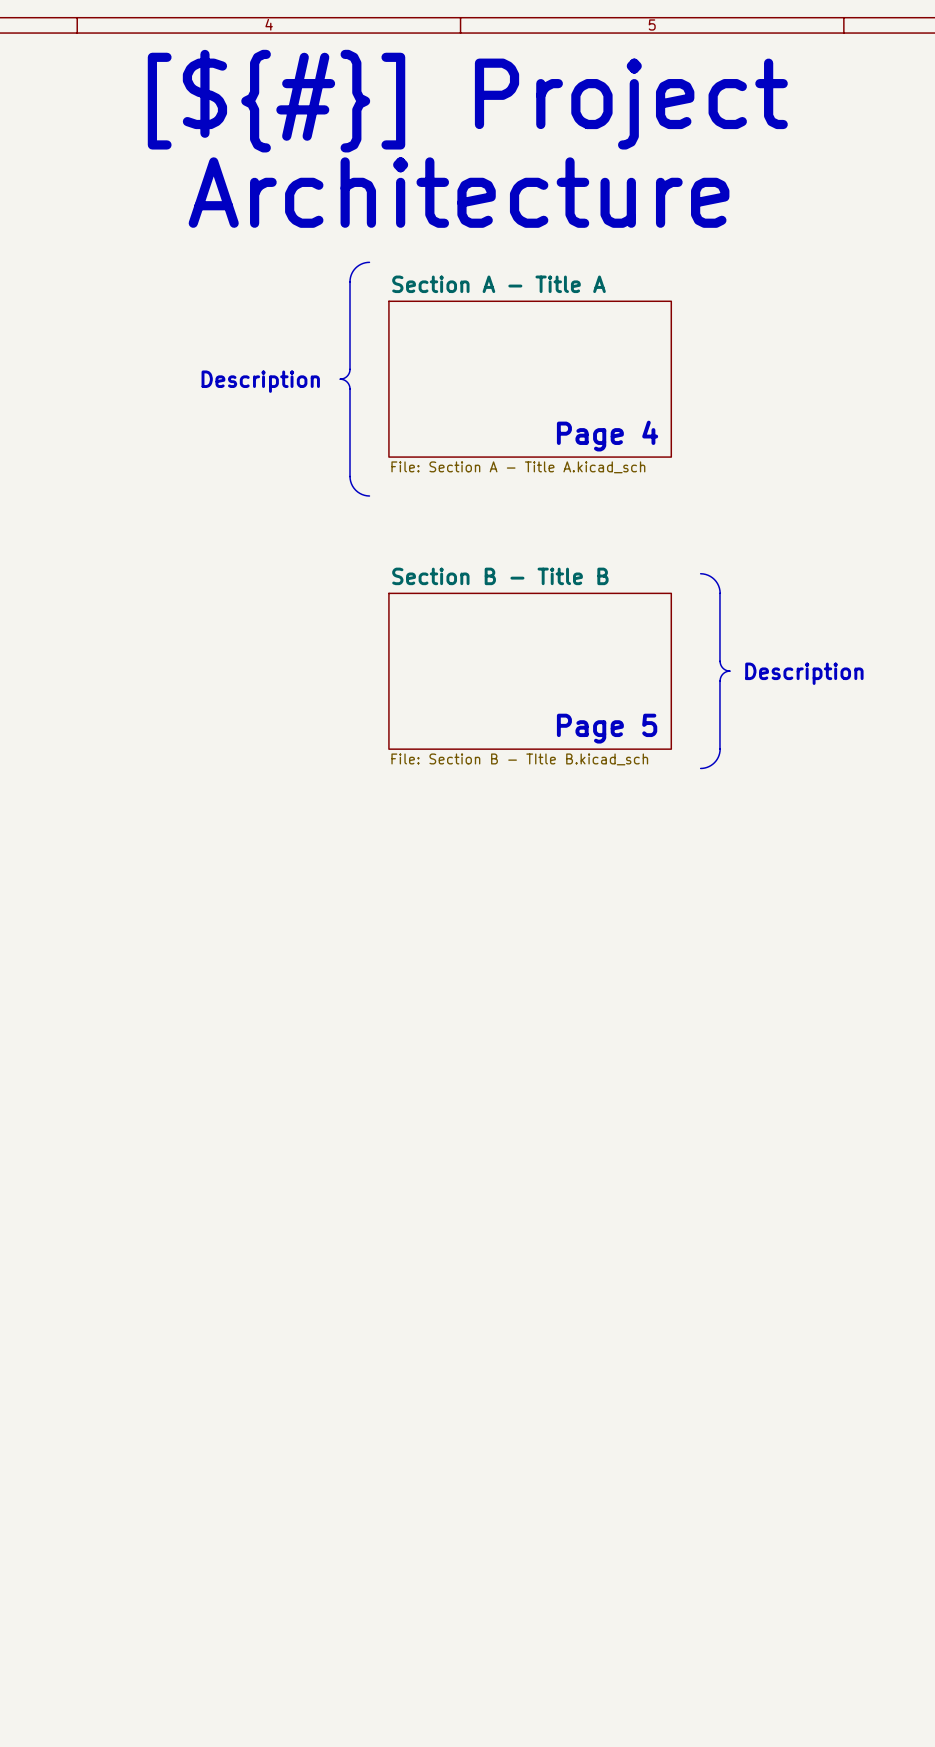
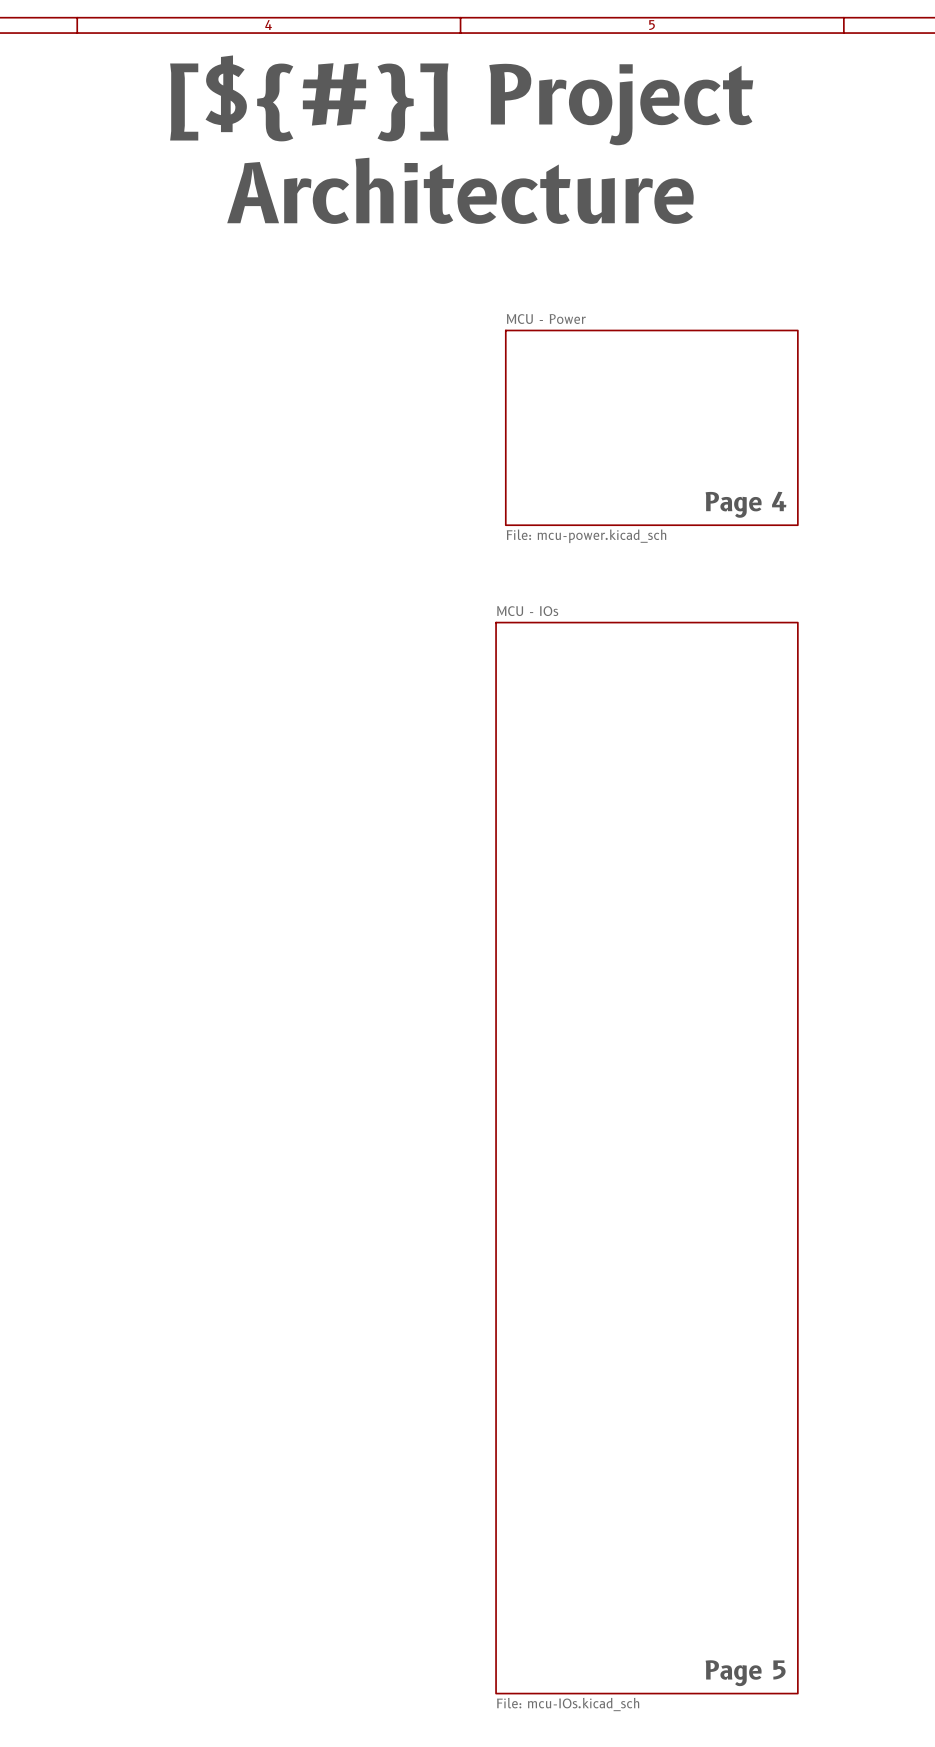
line: (369, 262) (357, 266) (350, 277) (349, 370) (346, 377) (340, 379) (346, 381) (349, 387) (350, 481) (357, 491) (369, 496) -> none
sheet Section A - Title A: File: Section A - Title A.kicad_sch (530, 379) -> none
text: Description (260, 381) -> none
sheet MCU - Power: none -> File: mcu-power.kicad_sch (651, 427)
text position: Page 4 (607, 436) -> Page 4 (745, 504)
line: (700, 573) (714, 579) (720, 593) -> none
line: (719, 593) (719, 661) -> none
line: (720, 661) (723, 668) (729, 671) (723, 673) (720, 680) -> none
sheet Section B - Title B: File: Section B - TItle B.kicad_sch (530, 671) -> none
text: Description (804, 673) -> none
line: (719, 680) (719, 749) -> none
text: Page 5 (607, 728) -> none
line: (720, 748) (714, 762) (700, 768) -> none
sheet MCU - IOs: none -> File: mcu-IOs.kicad_sch (646, 1158)
text: none -> Page 5 (745, 1673)

